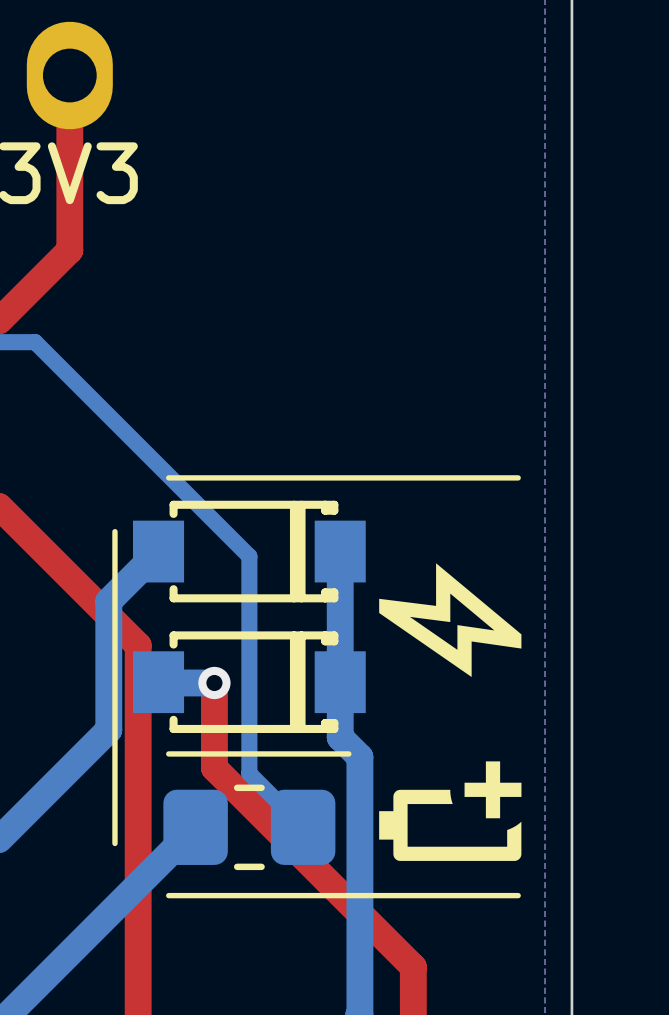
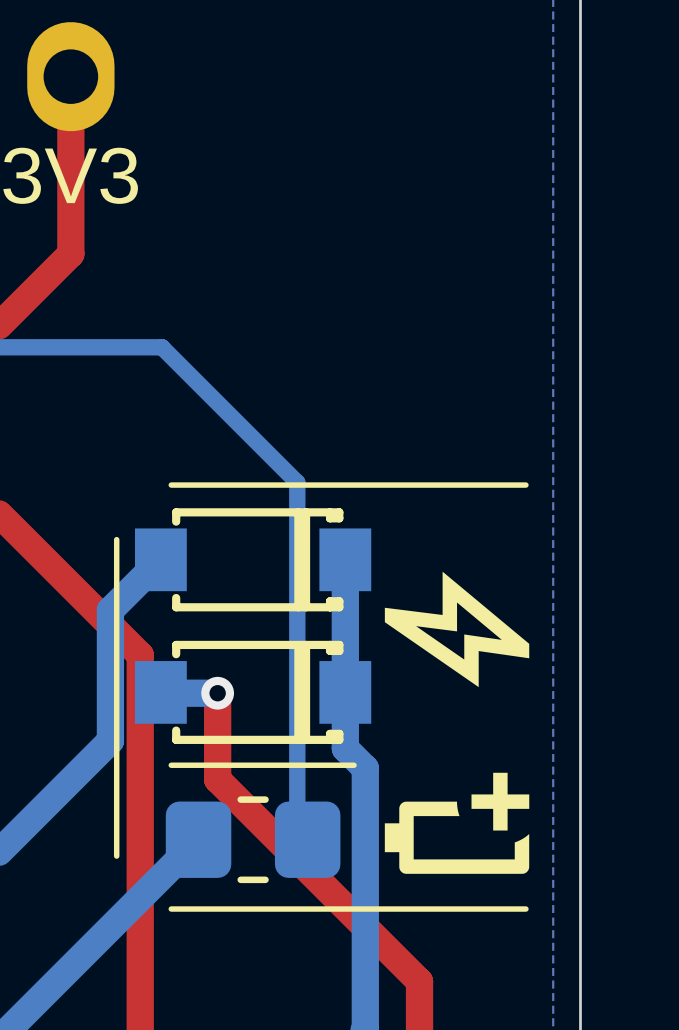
bottom track: (35, 342) (249, 556) (249, 773) (292, 817) -> (35, 347) (162, 347) (297, 482) (297, 829)

